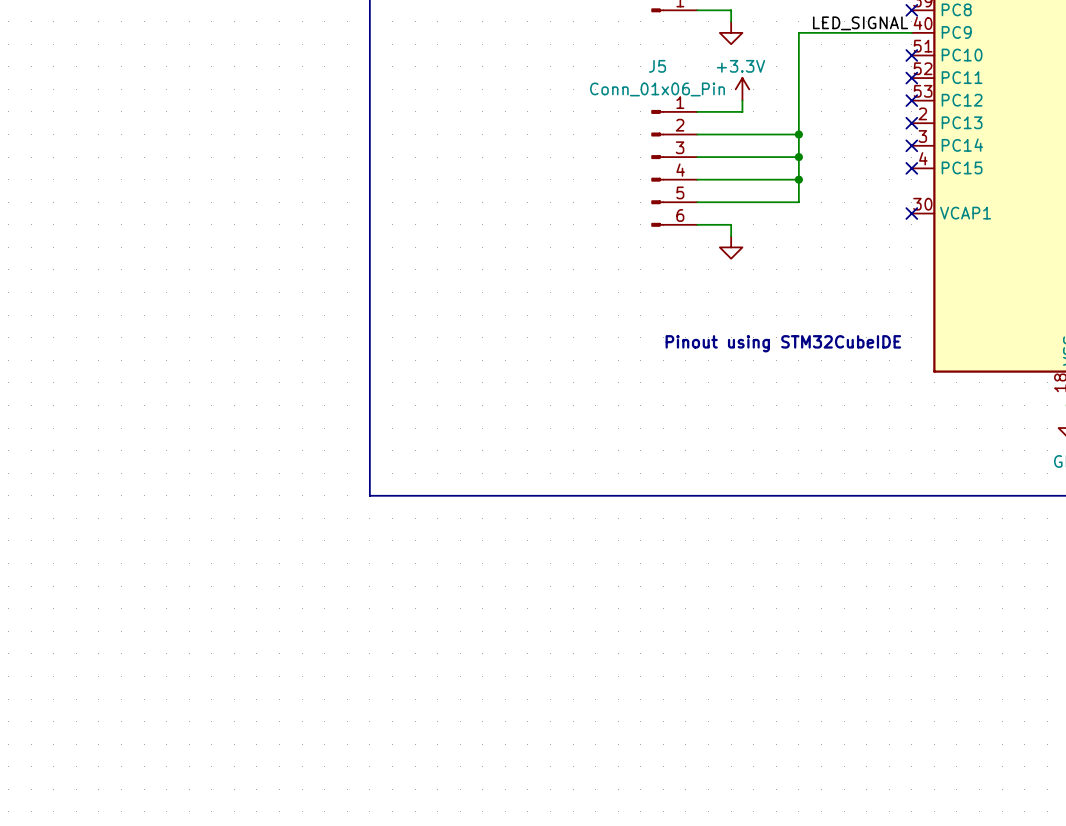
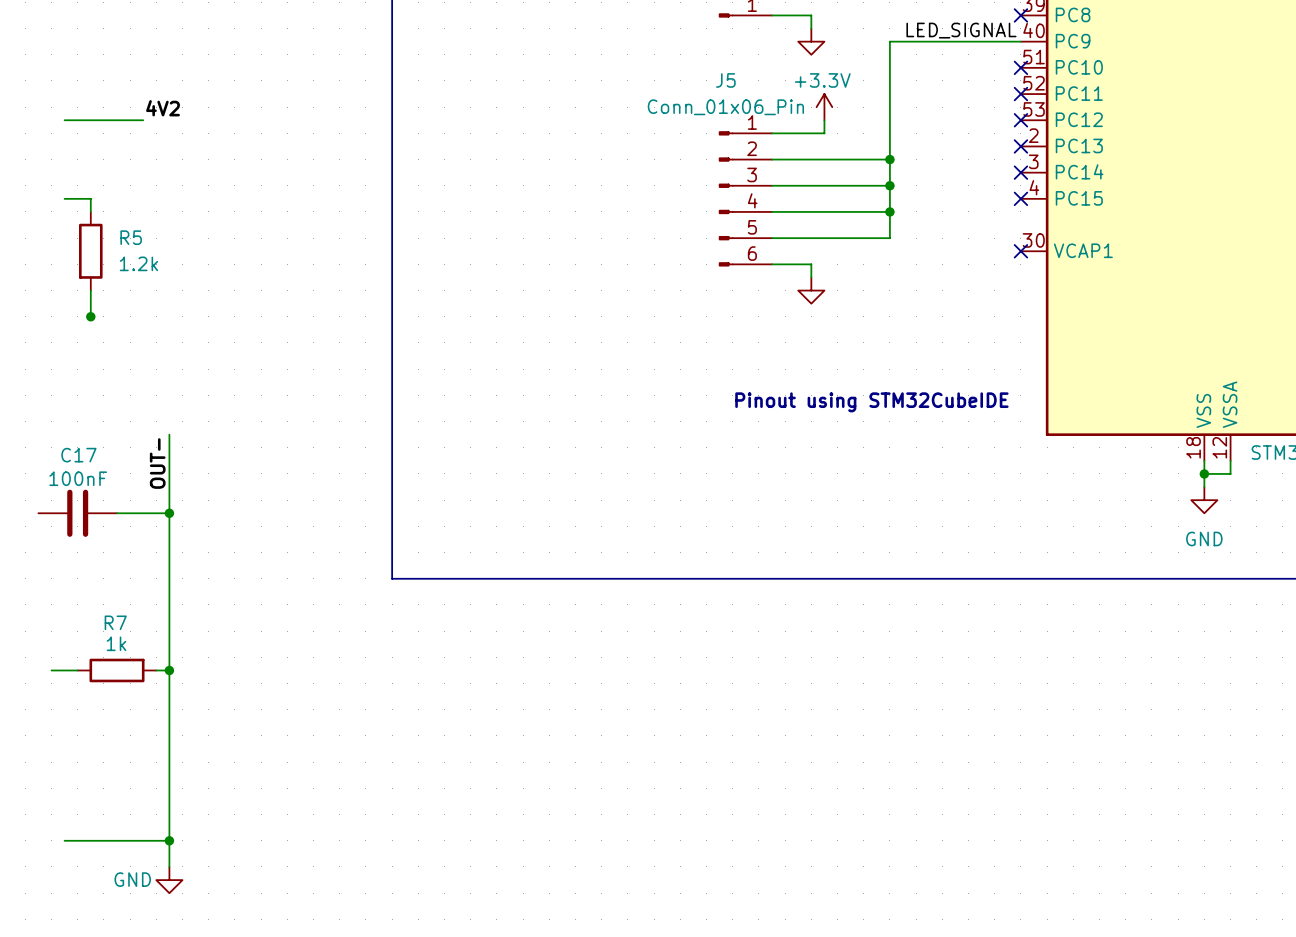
label: none -> 4V2 (163, 108)
wire: none -> (64, 120) (143, 120)
wire: none -> (64, 198) (90, 198) (90, 211)
R5: none -> 1.2k (90, 251)
wire: none -> (90, 290) (90, 316)
junction: none -> (90, 316)
wire: none -> (169, 434) (169, 866)
label: none -> OUT- (157, 463)
C17: none -> 100nF (77, 513)
wire: none -> (117, 513) (169, 513)
junction: none -> (169, 513)
wire: none -> (51, 670) (77, 670)
R7: none -> 1k (117, 670)
wire: none -> (156, 670) (169, 670)
junction: none -> (169, 670)
wire: none -> (64, 840) (169, 840)
junction: none -> (169, 840)
power symbol: none -> GND (169, 880)

